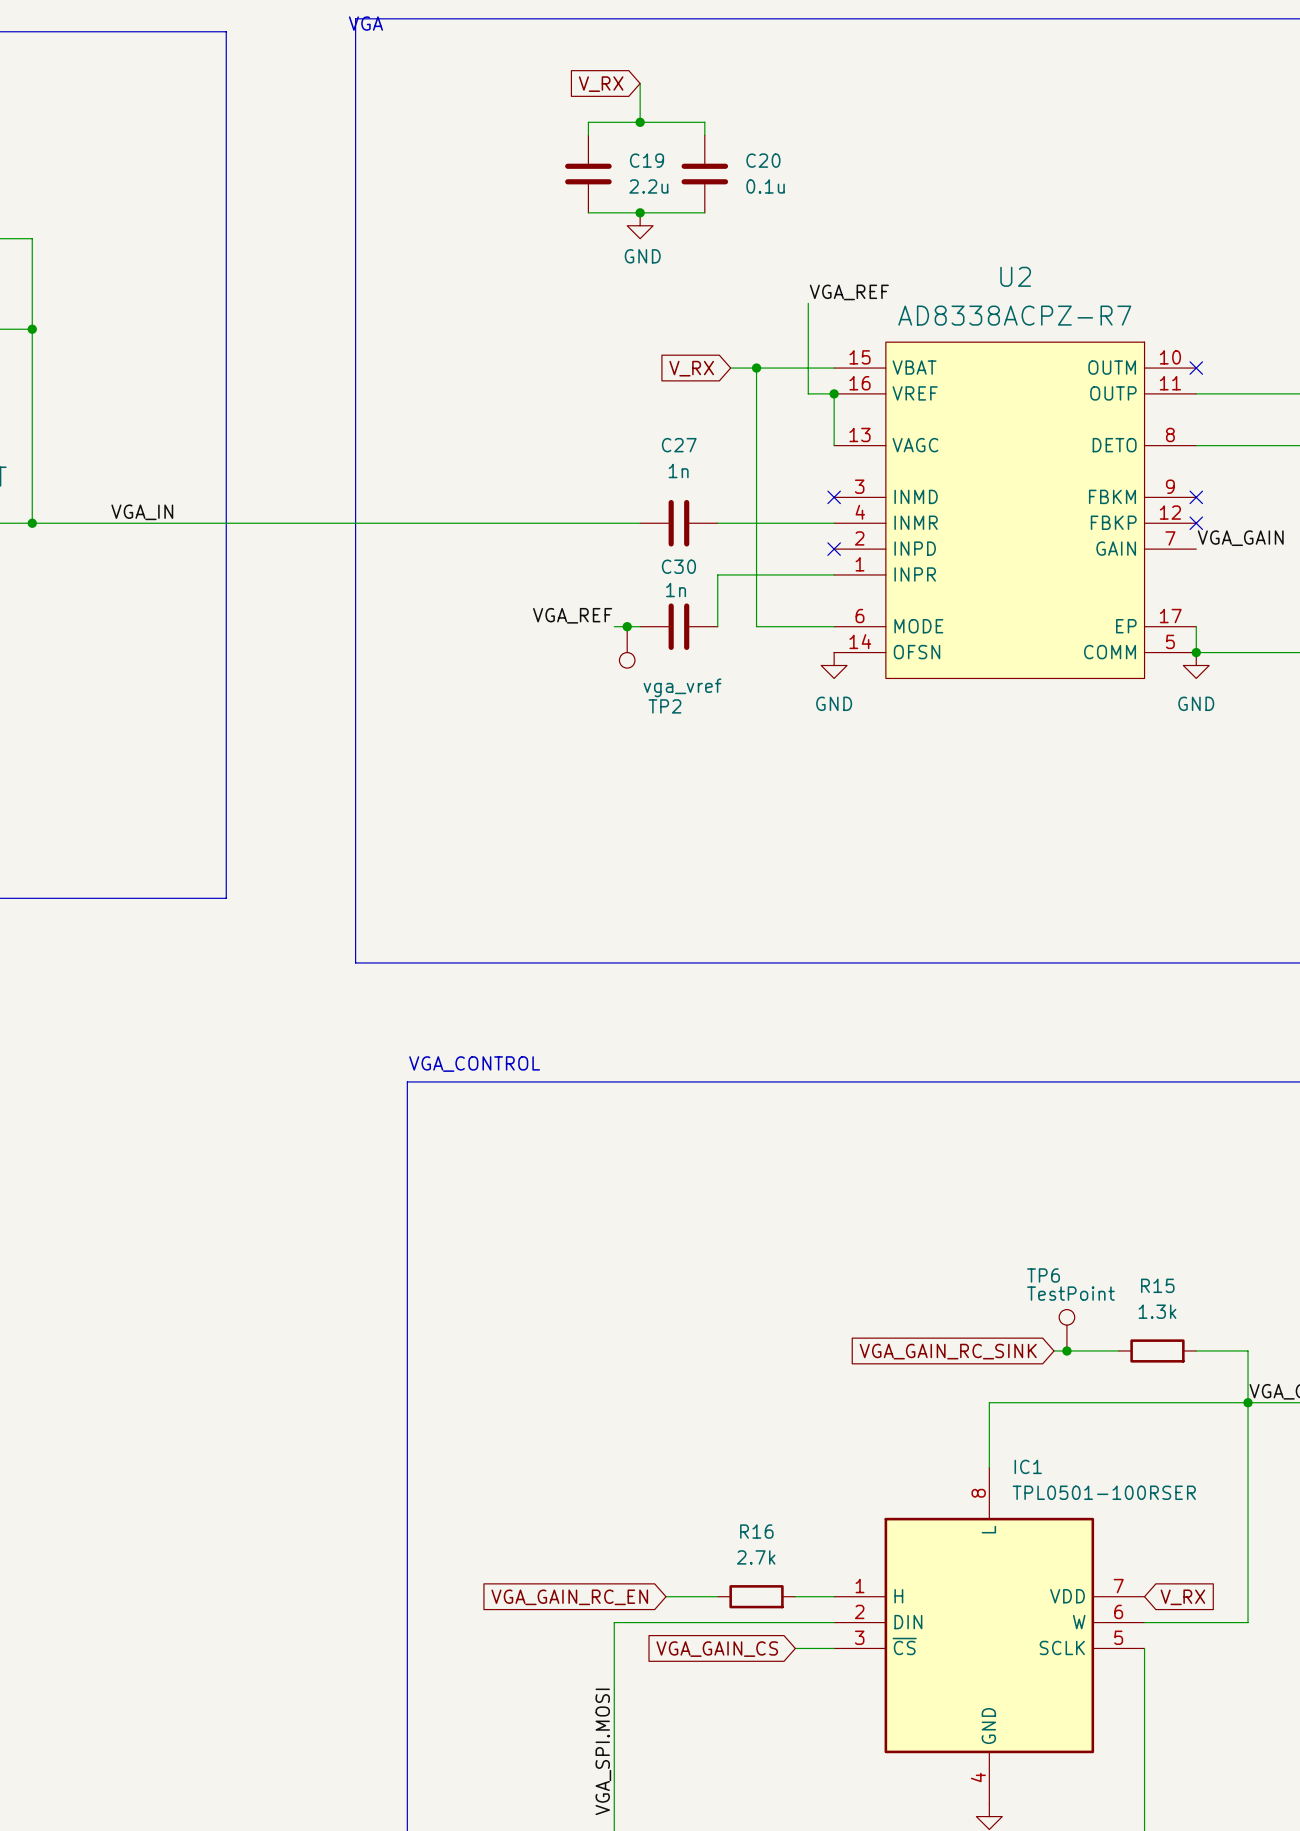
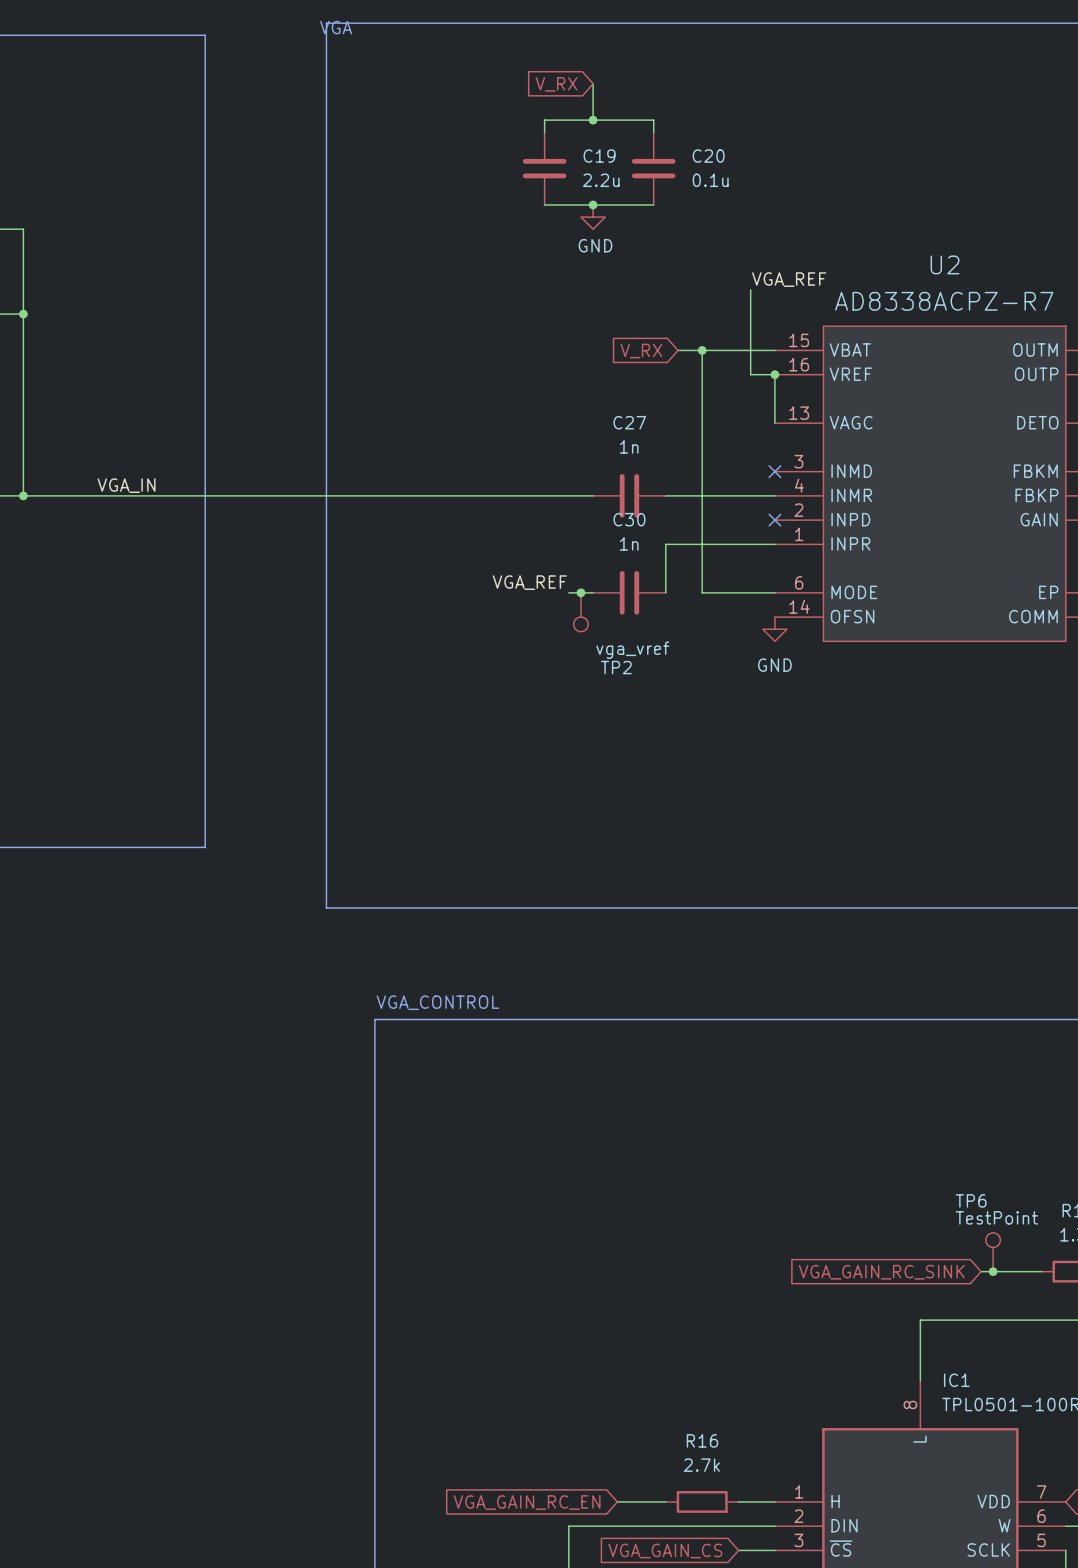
C30 name position: C30 (678, 566) -> C30 (629, 519)
C30 value position: 1n (676, 590) -> 1n (629, 543)

